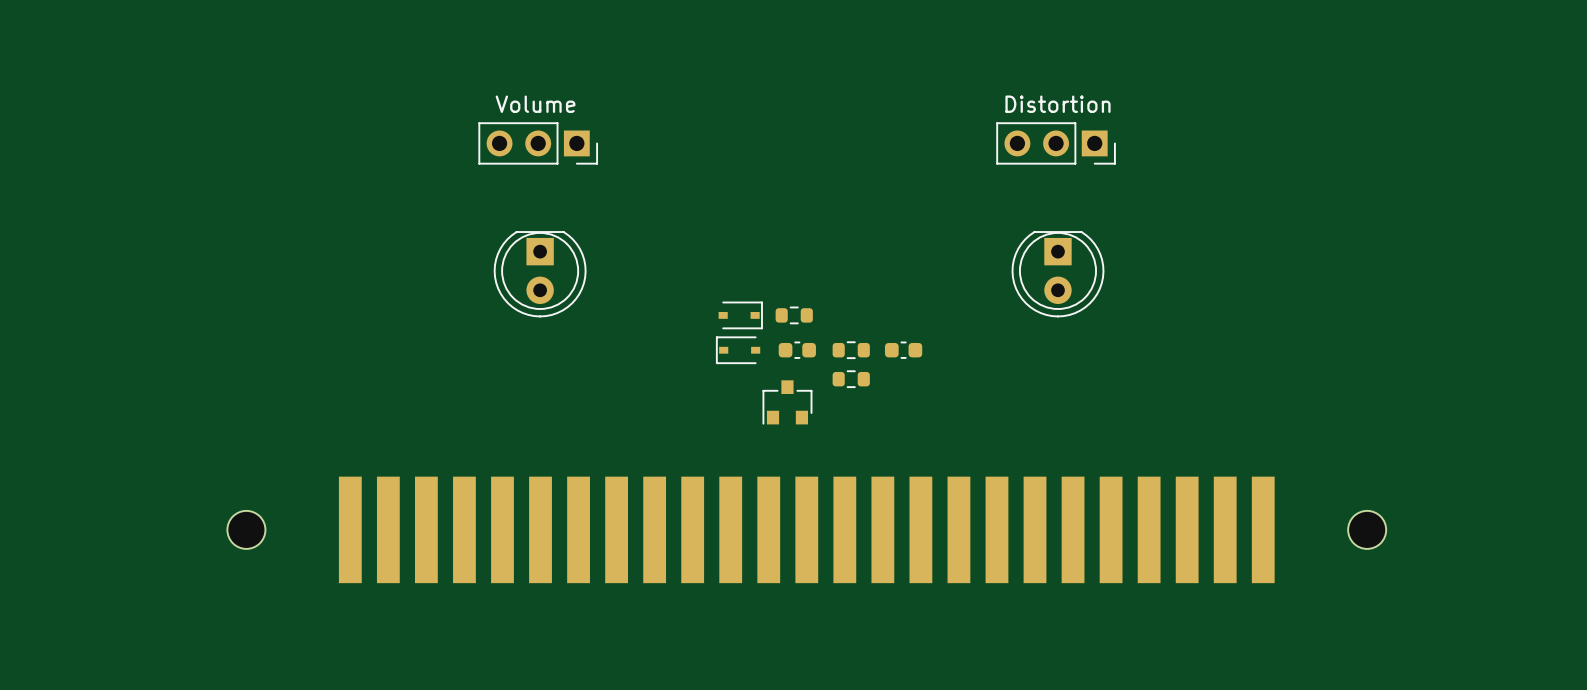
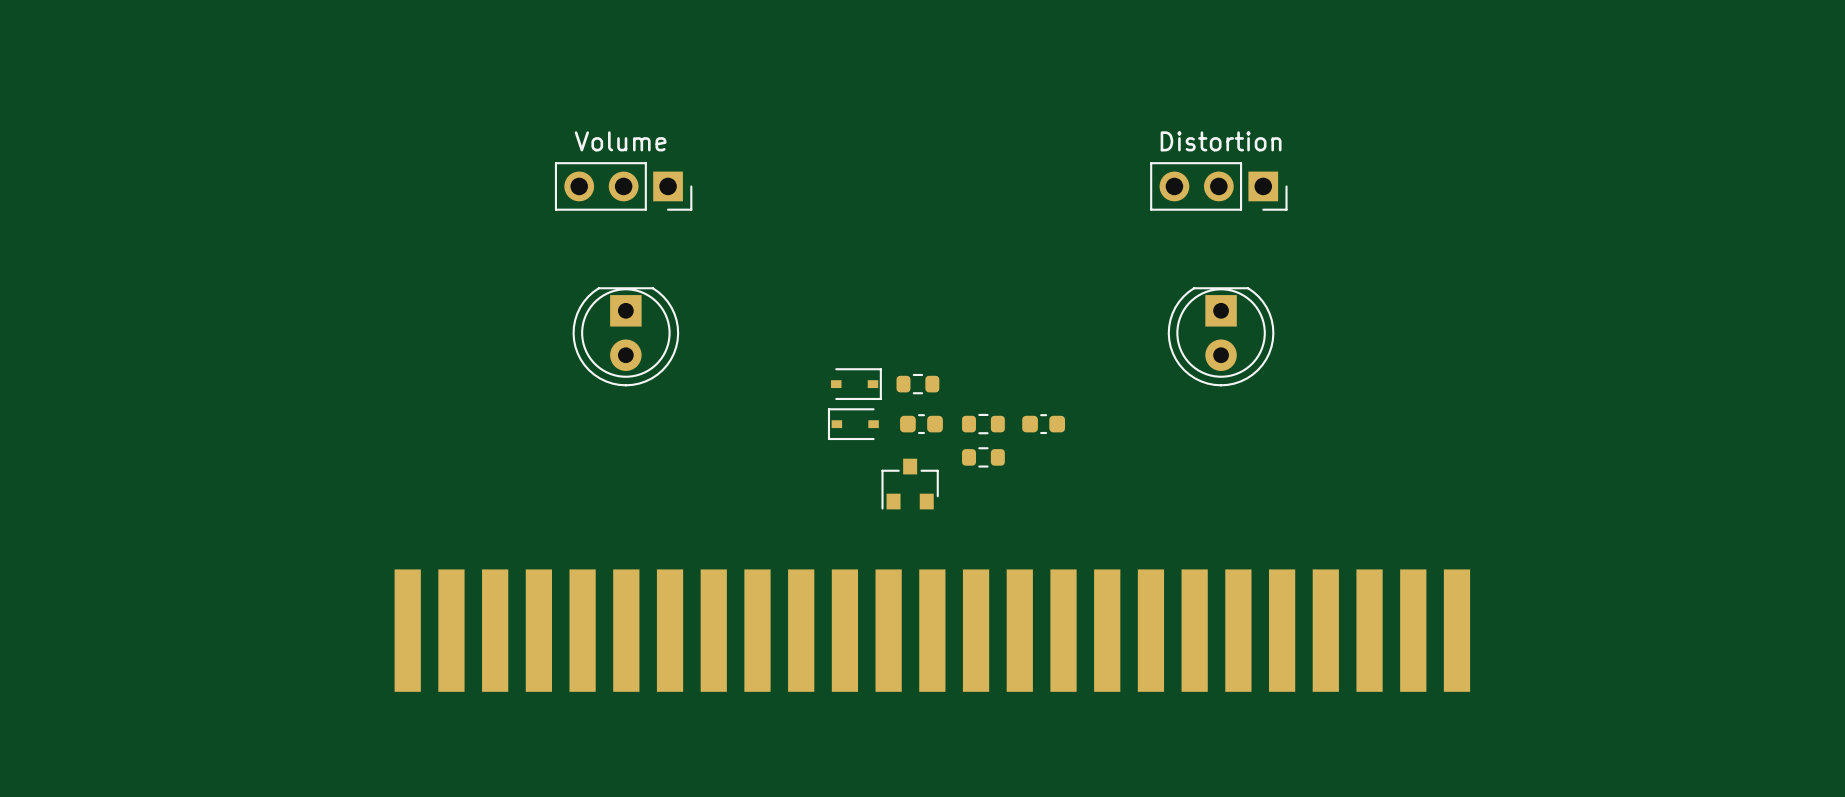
part: (246, 529) -> none
part: (1367, 529) -> none

